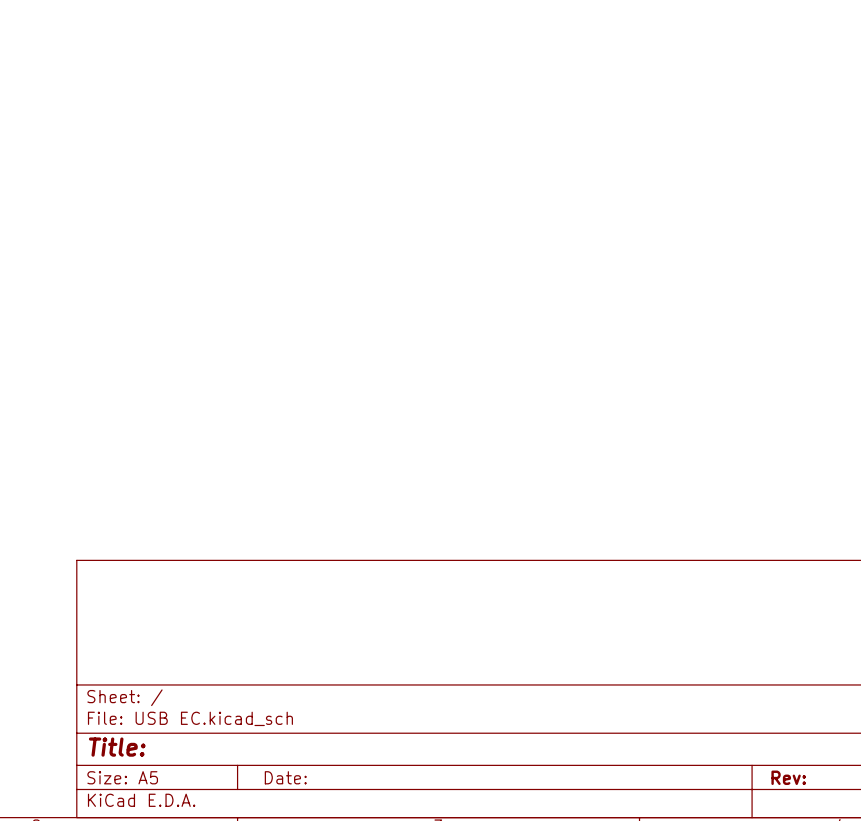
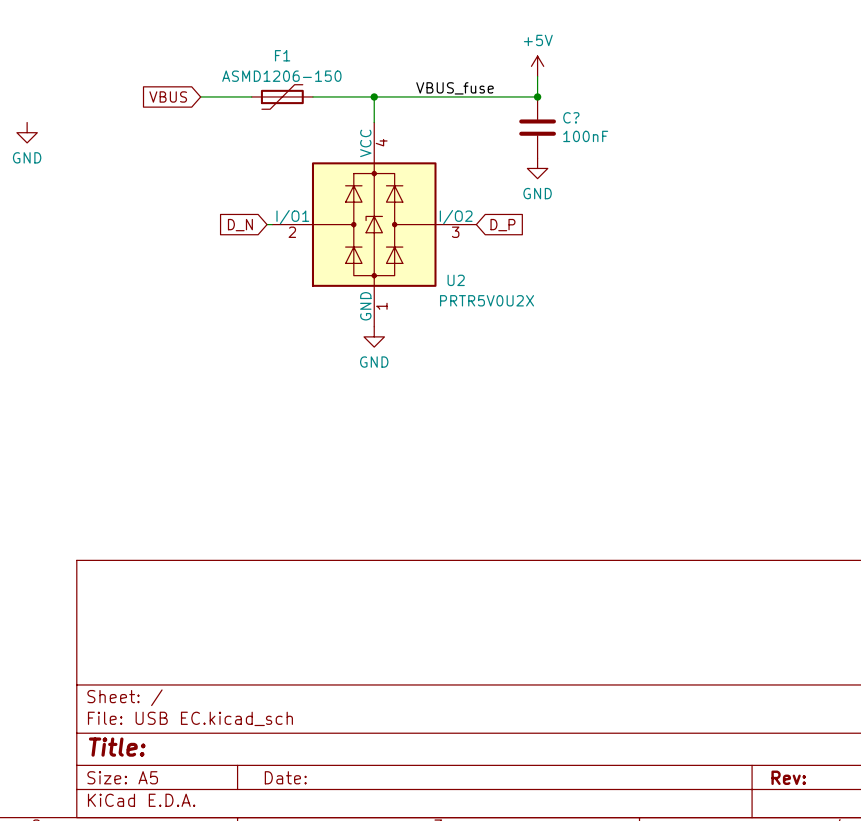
power symbol: none -> +5V (537, 66)
wire: none -> (537, 76) (537, 96) (312, 96)
label: none -> VBUS_fuse (455, 88)
global label: none -> VBUS (168, 96)
wire: none -> (200, 96) (251, 96)
F1: none -> ASMD1206-150 (282, 96)
wire: none -> (374, 96) (374, 122)
junction: none -> (374, 96)
junction: none -> (537, 96)
C?: none -> 100nF (537, 127)
power symbol: none -> GND (27, 132)
power symbol: none -> GND (537, 168)
wire: none -> (267, 224) (272, 224)
U2: none -> PRTR5V0U2X (374, 224)
global label: none -> D_N (240, 225)
global label: none -> D_P (502, 225)
power symbol: none -> GND (374, 336)

